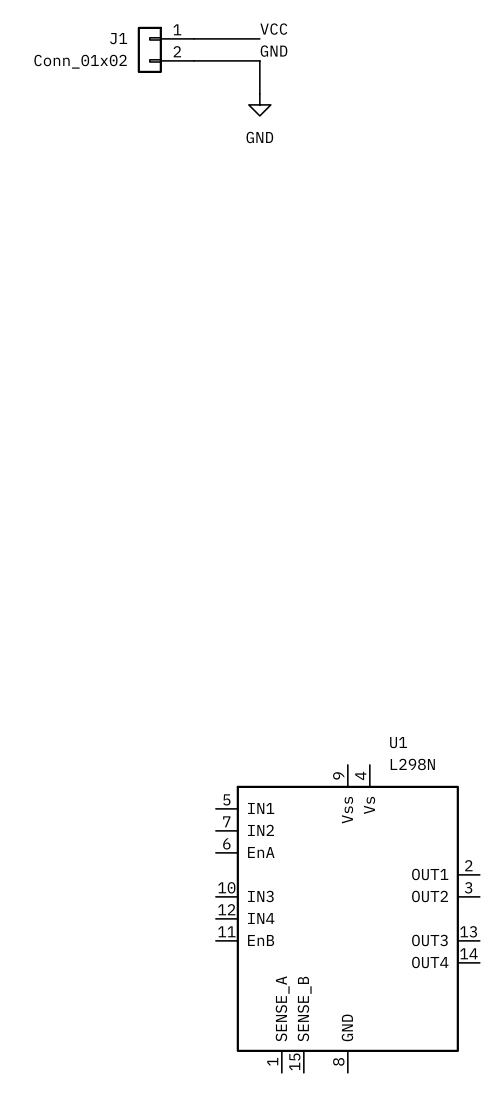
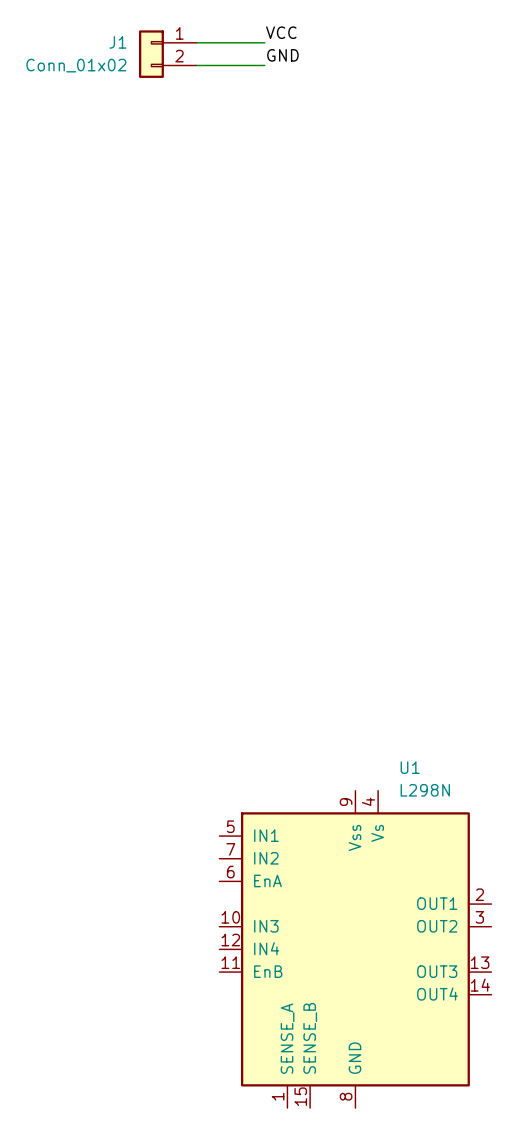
wire: (259, 60) (259, 93) -> none
power symbol: GND (259, 104) -> none

